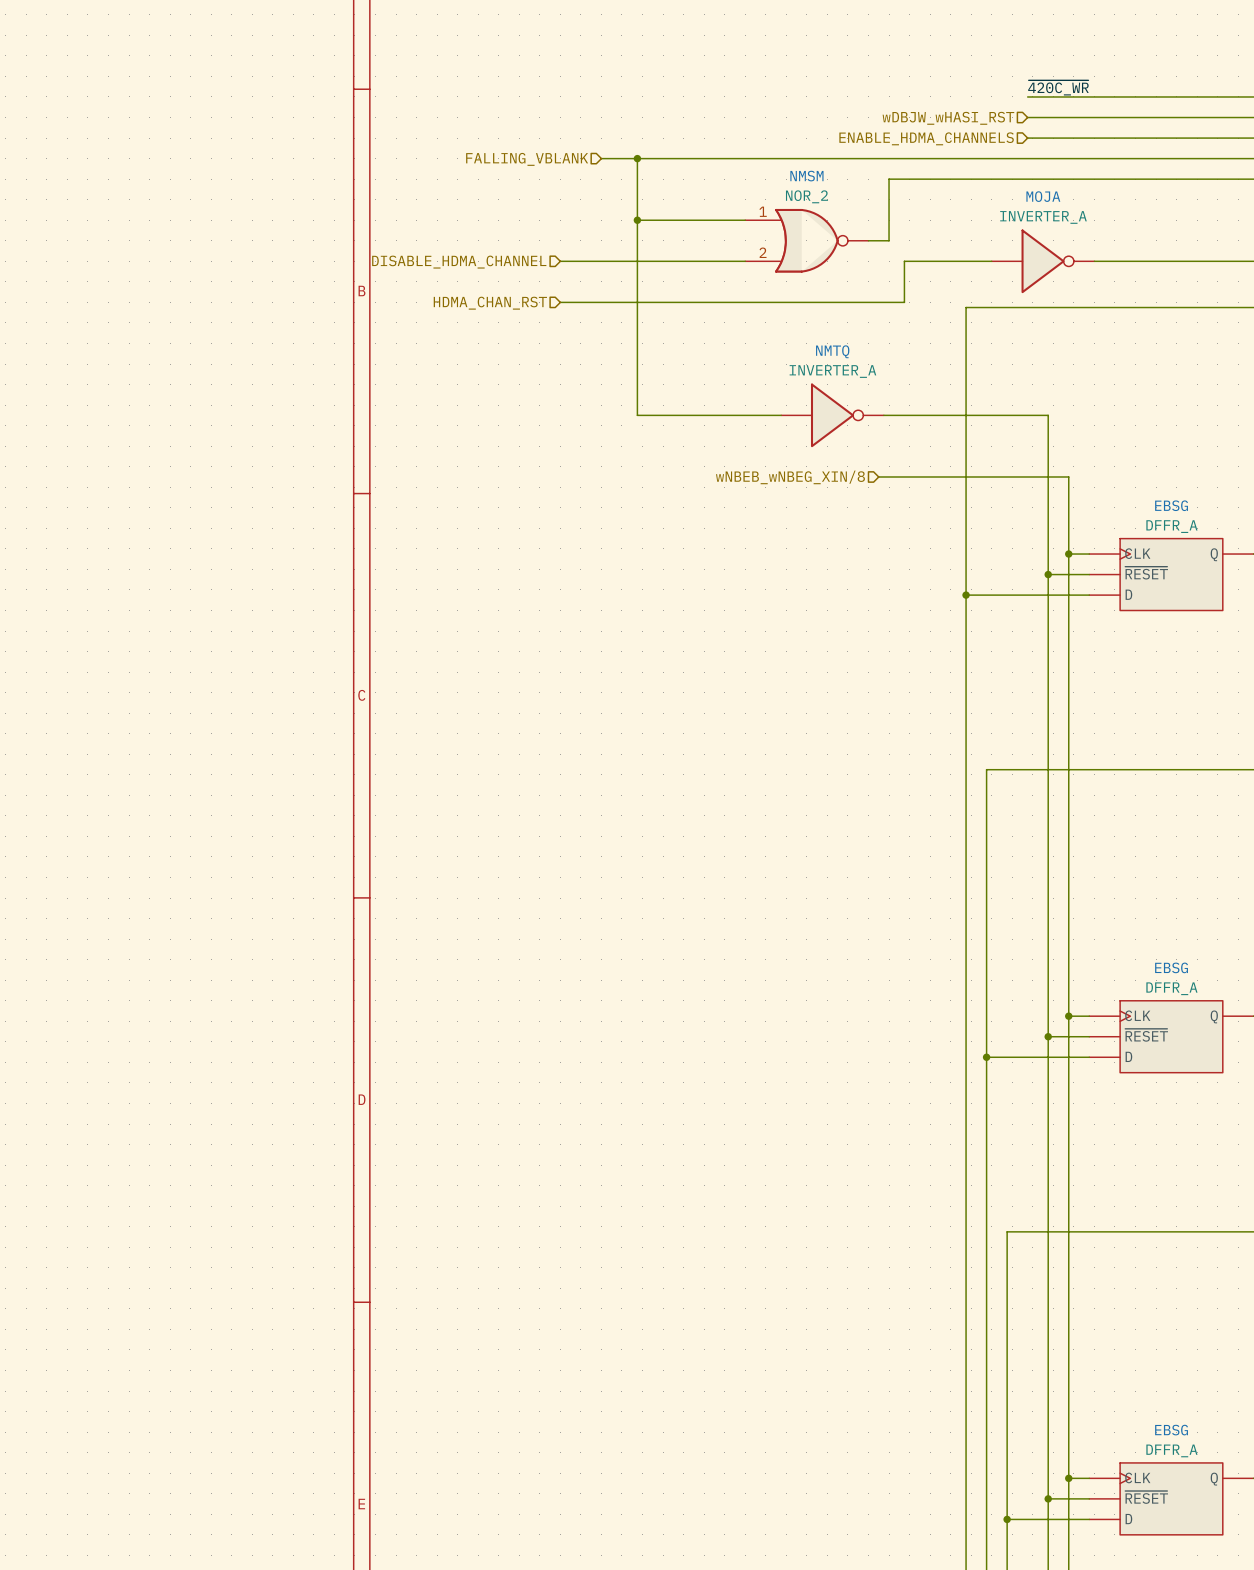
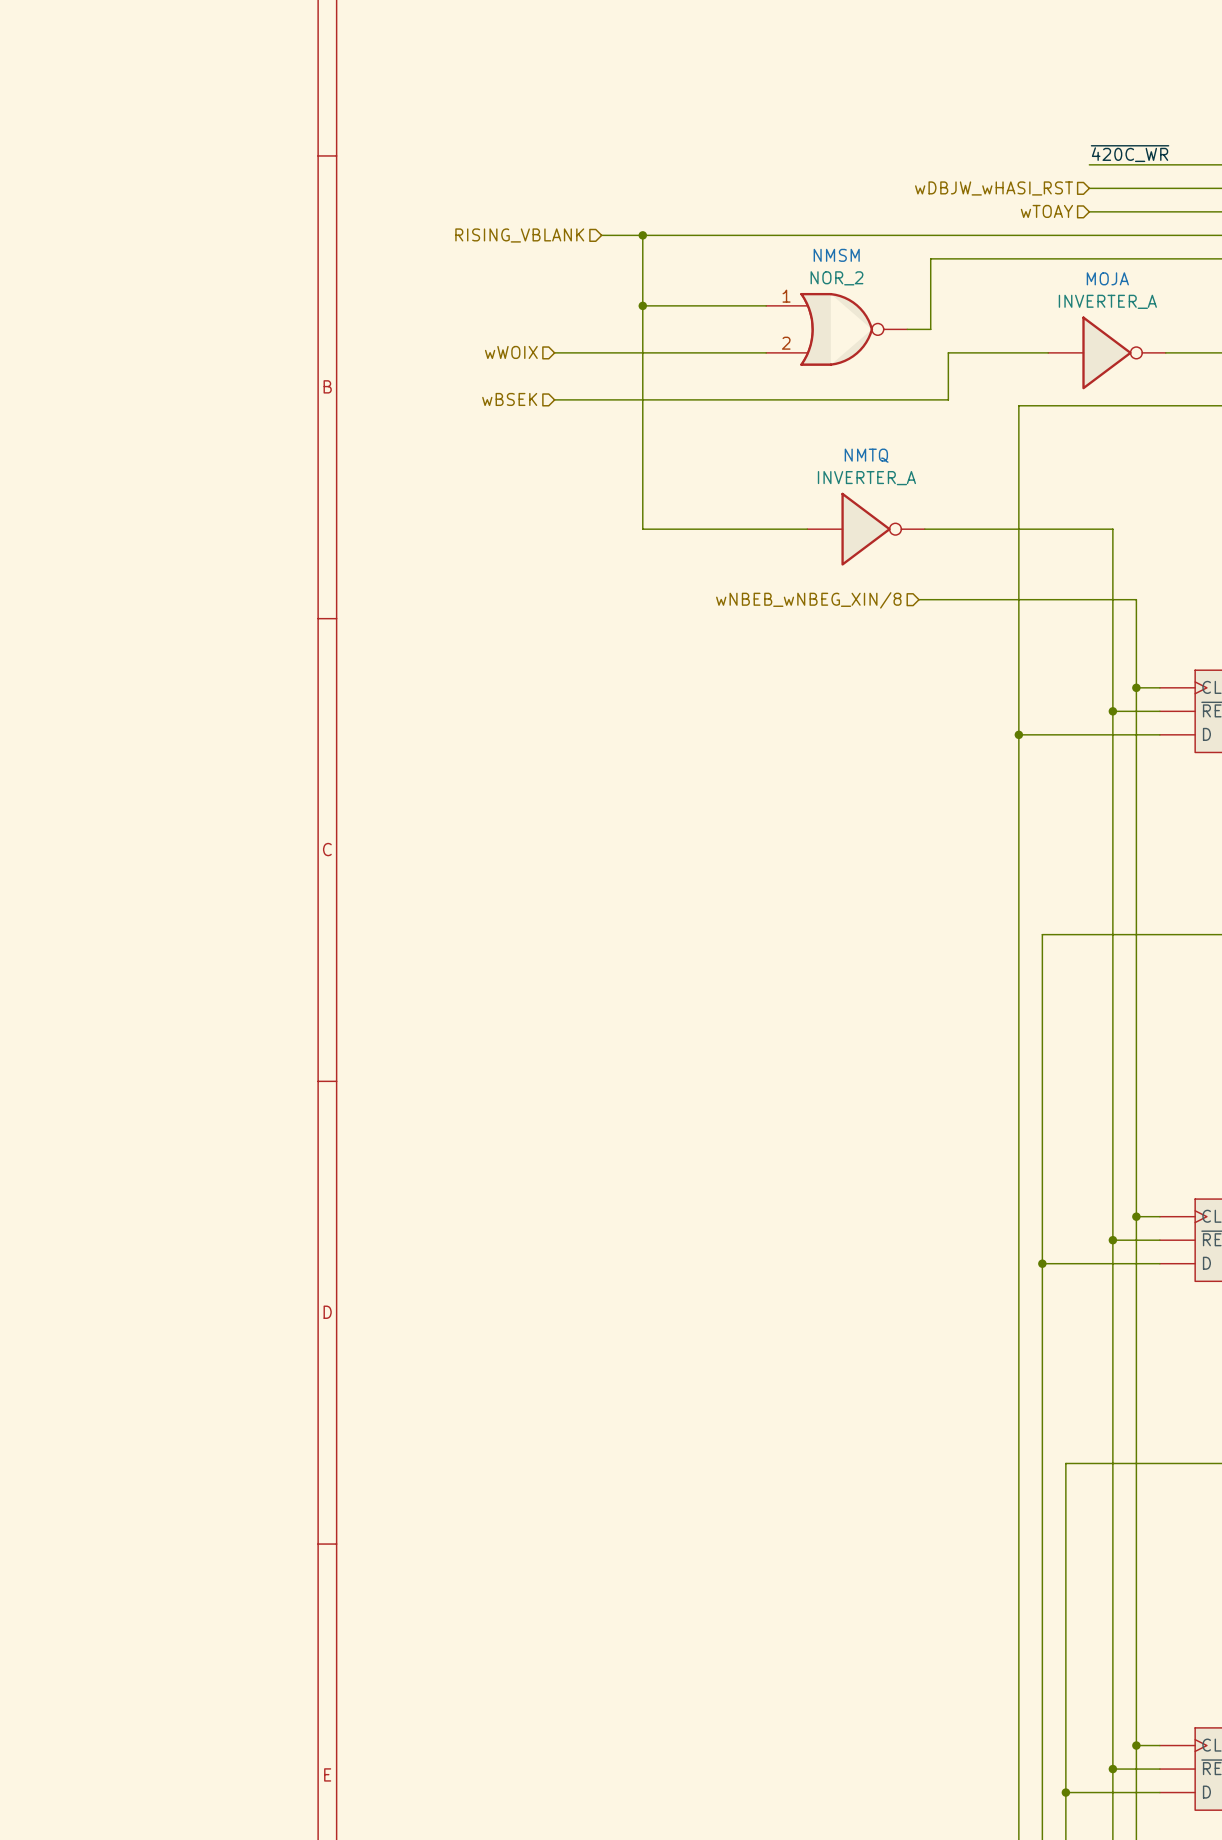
hierarchical label: ENABLE_HDMA_CHANNELS (926, 138) -> wTOAY (1046, 211)
hierarchical label: FALLING_VBLANK (527, 159) -> RISING_VBLANK (519, 235)
hierarchical label: DISABLE_HDMA_CHANNEL (459, 262) -> wWOIX (511, 352)
hierarchical label: HDMA_CHAN_RST (490, 303) -> wBSEK (509, 399)

